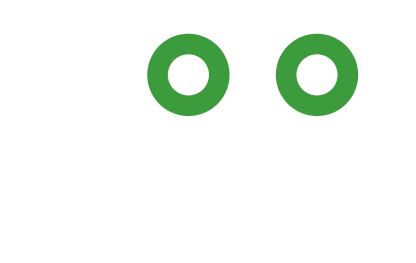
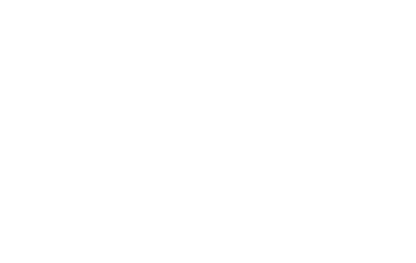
part: (252, 74) -> none

